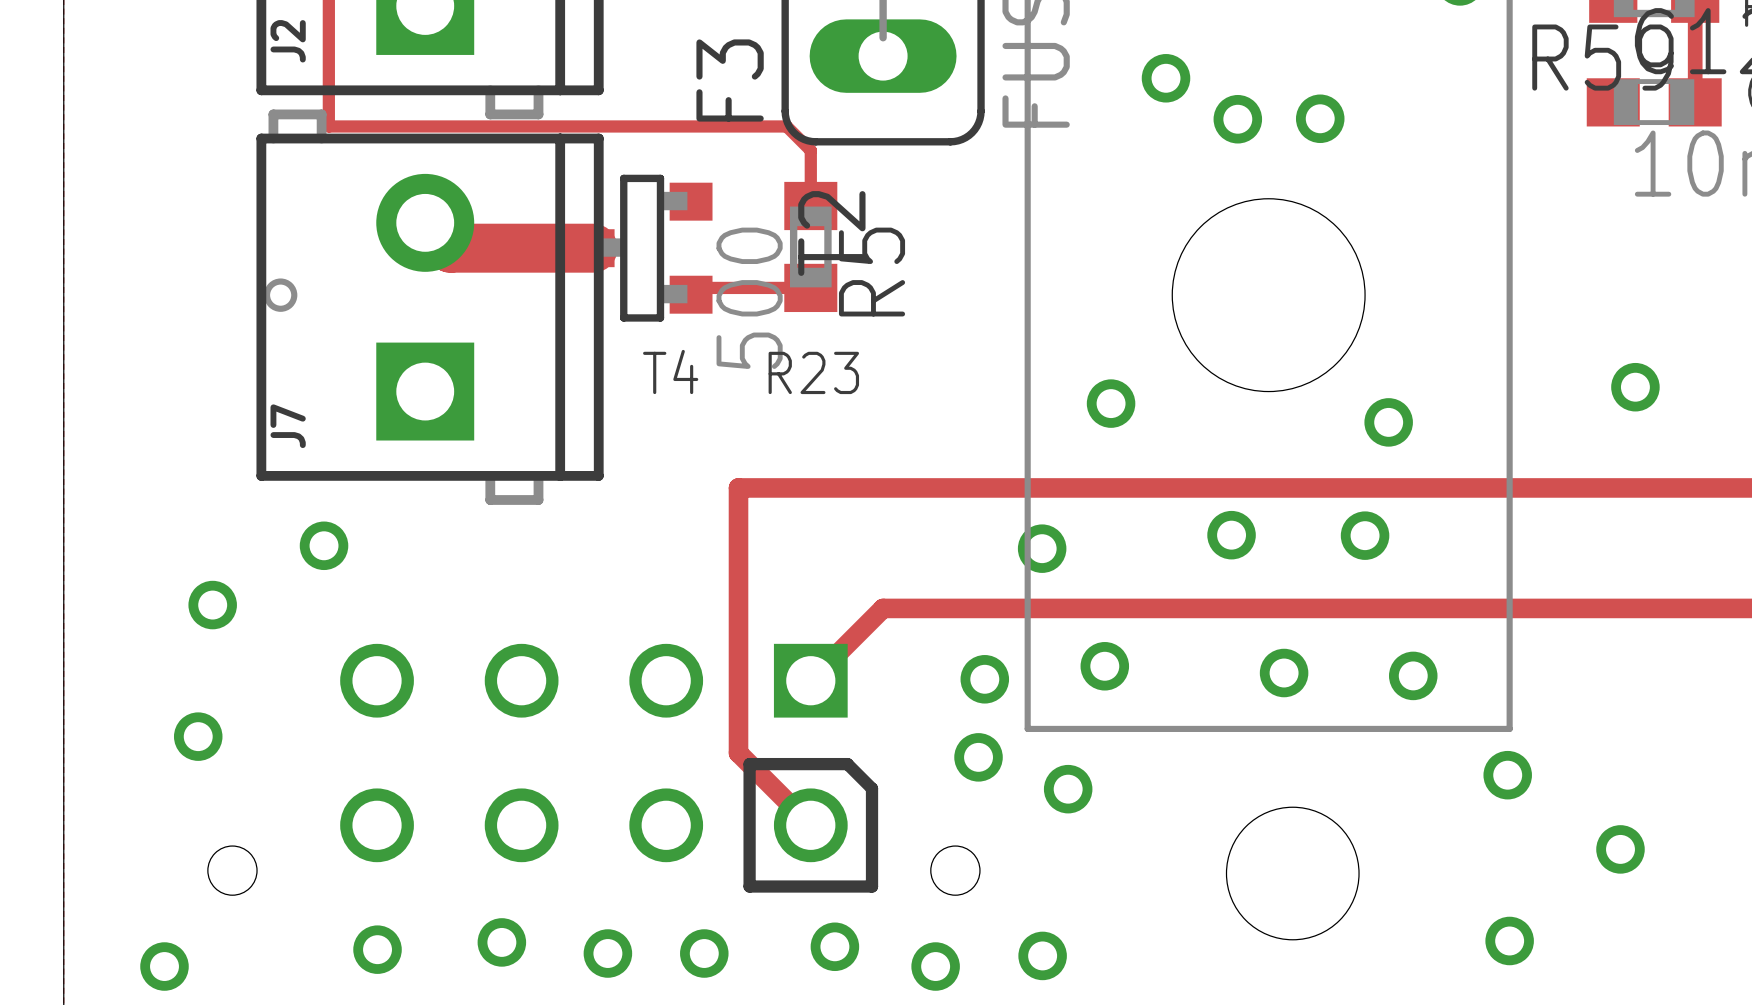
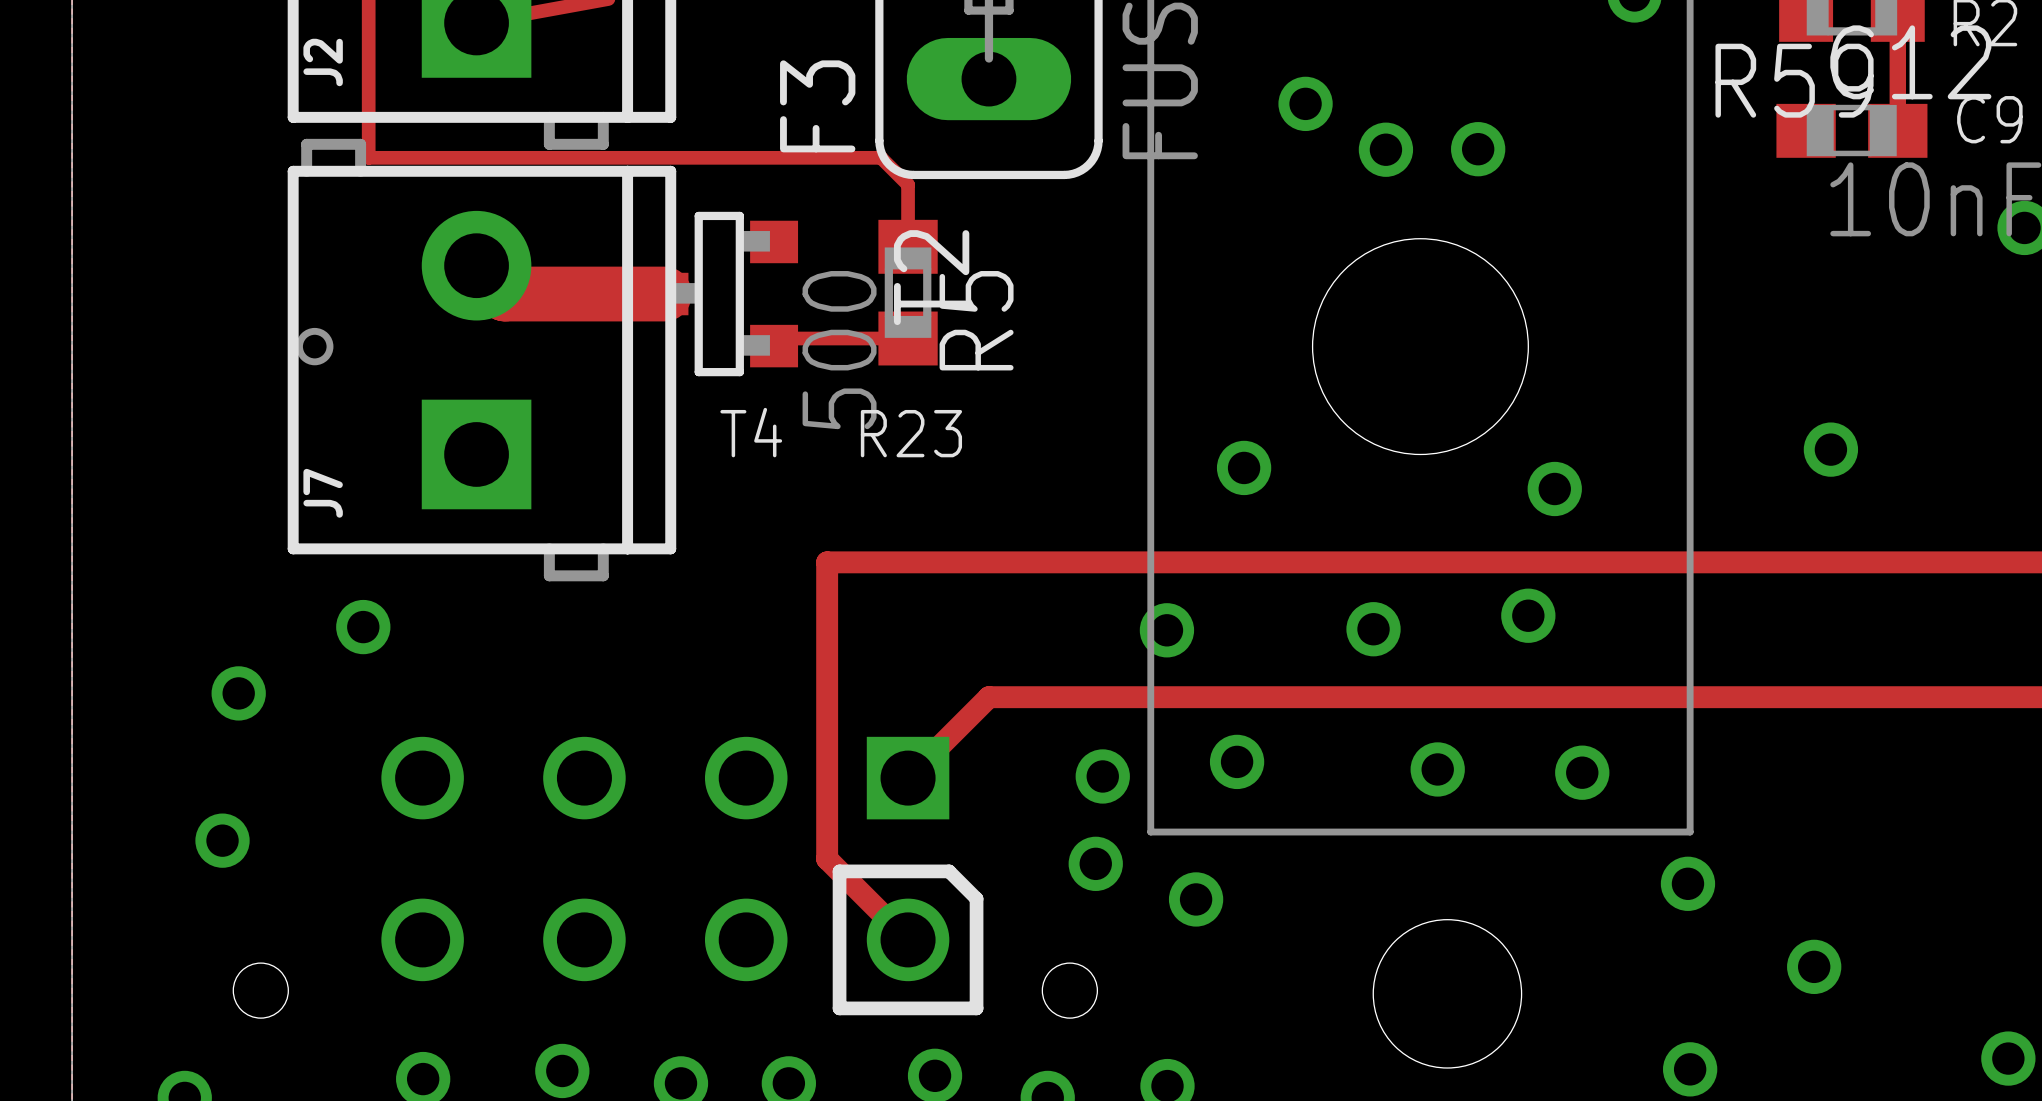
via position: (1231, 535) -> (1373, 629)

